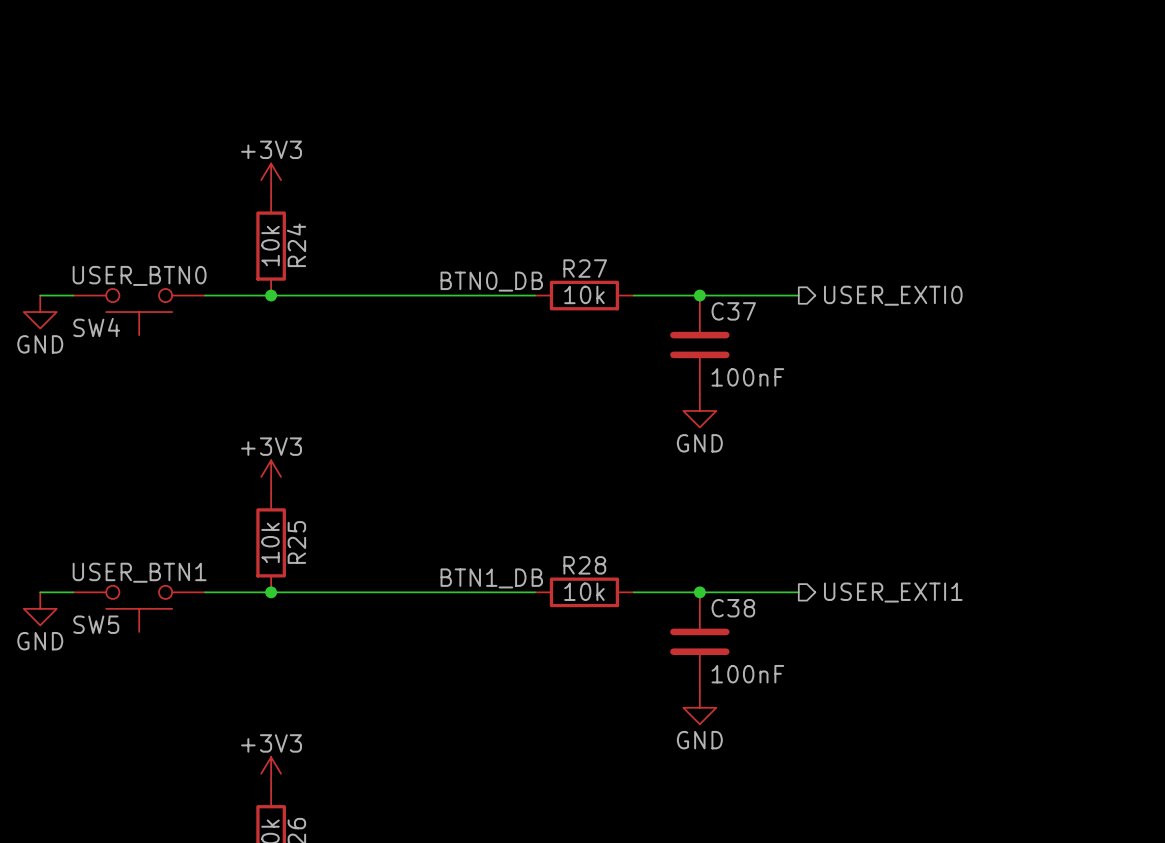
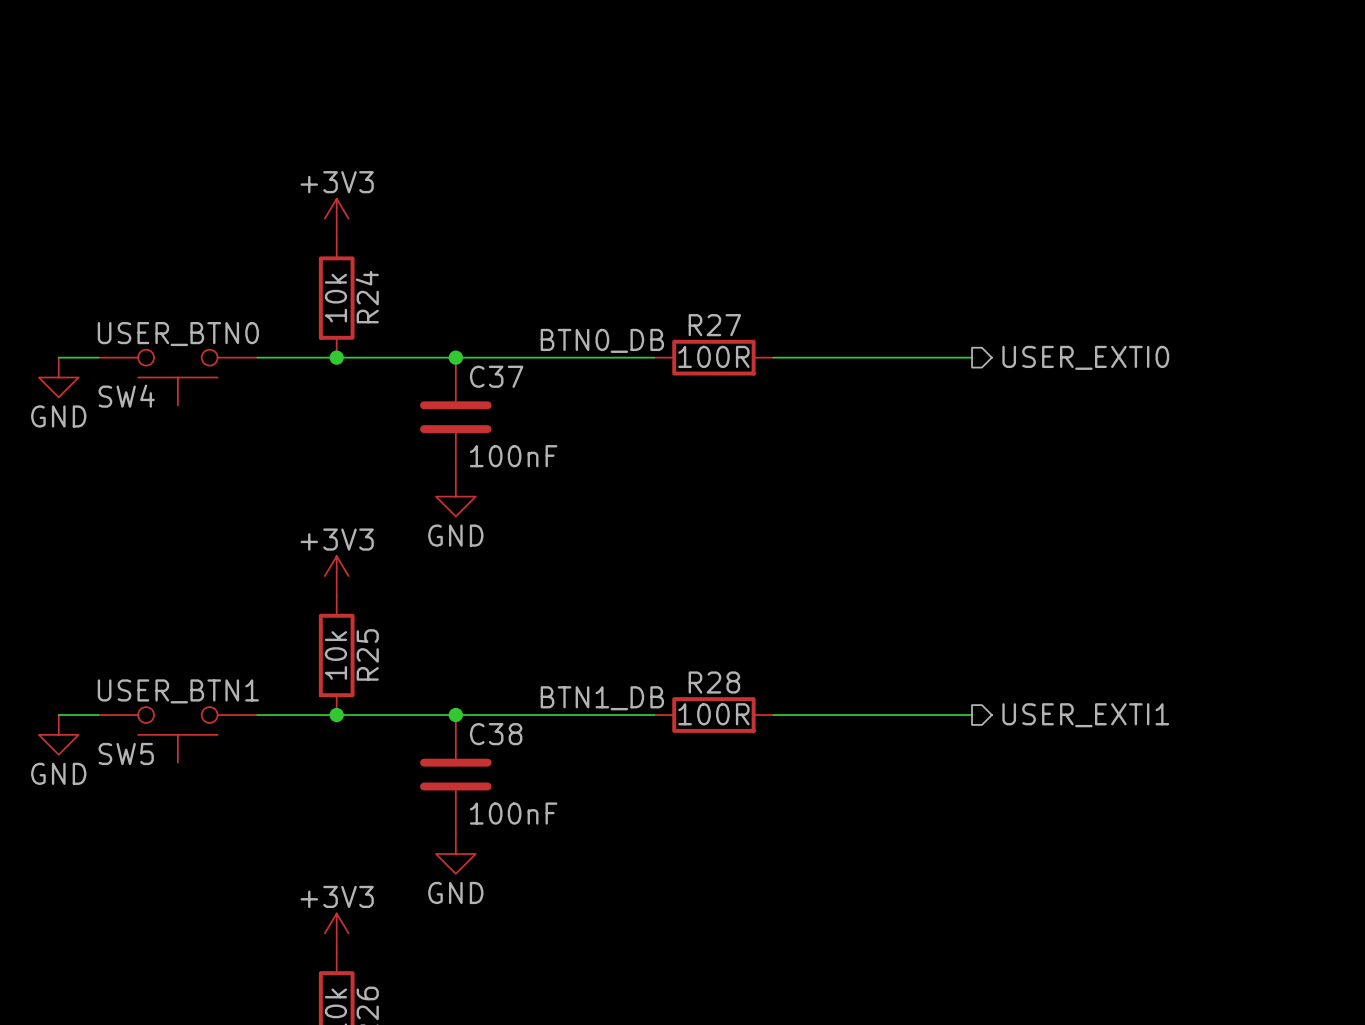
R27 value: 10k (584, 294) -> 100R (713, 356)
junction: none -> (455, 357)
junction: (699, 295) -> none
C37 position: (699, 345) -> (455, 417)
power symbol: none -> GND (455, 496)
power symbol: GND (699, 410) -> none
R28 value: 10k (584, 591) -> 100R (713, 714)
junction: none -> (455, 715)
junction: (699, 592) -> none
C38 position: (699, 641) -> (455, 774)
power symbol: none -> GND (455, 853)
power symbol: GND (699, 707) -> none

